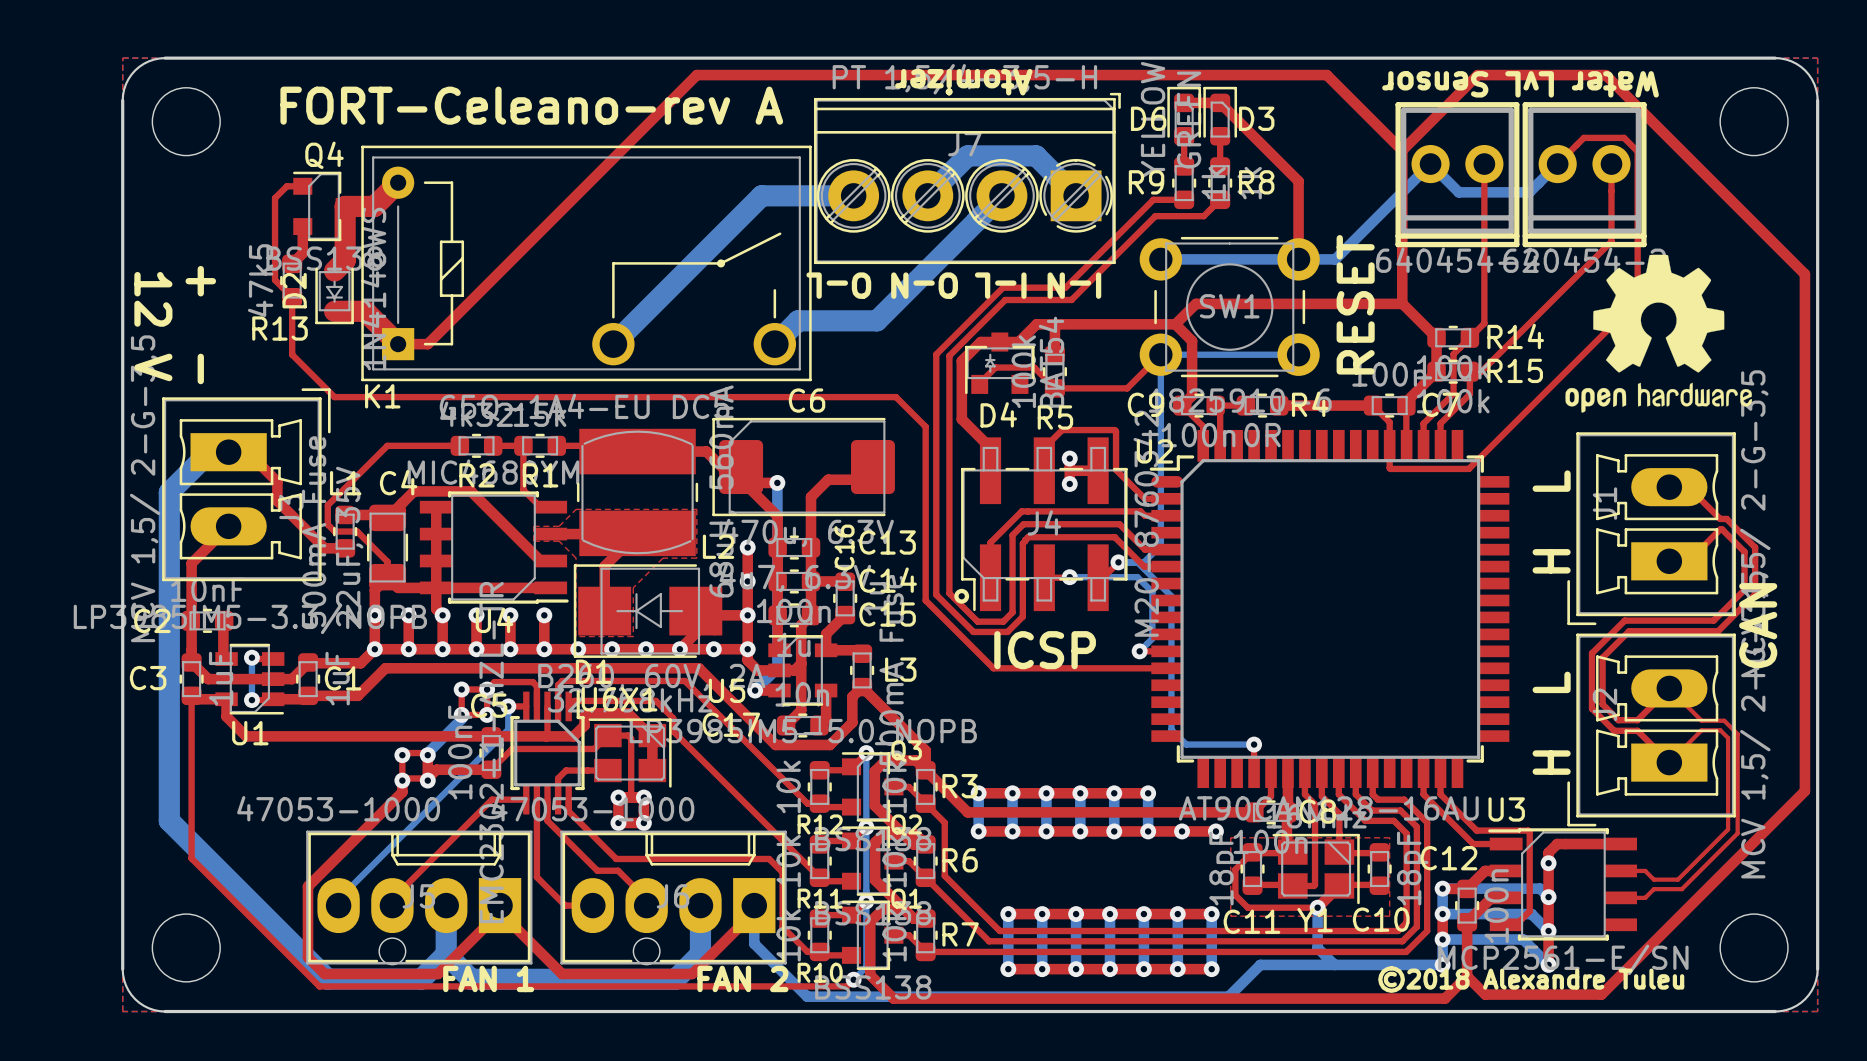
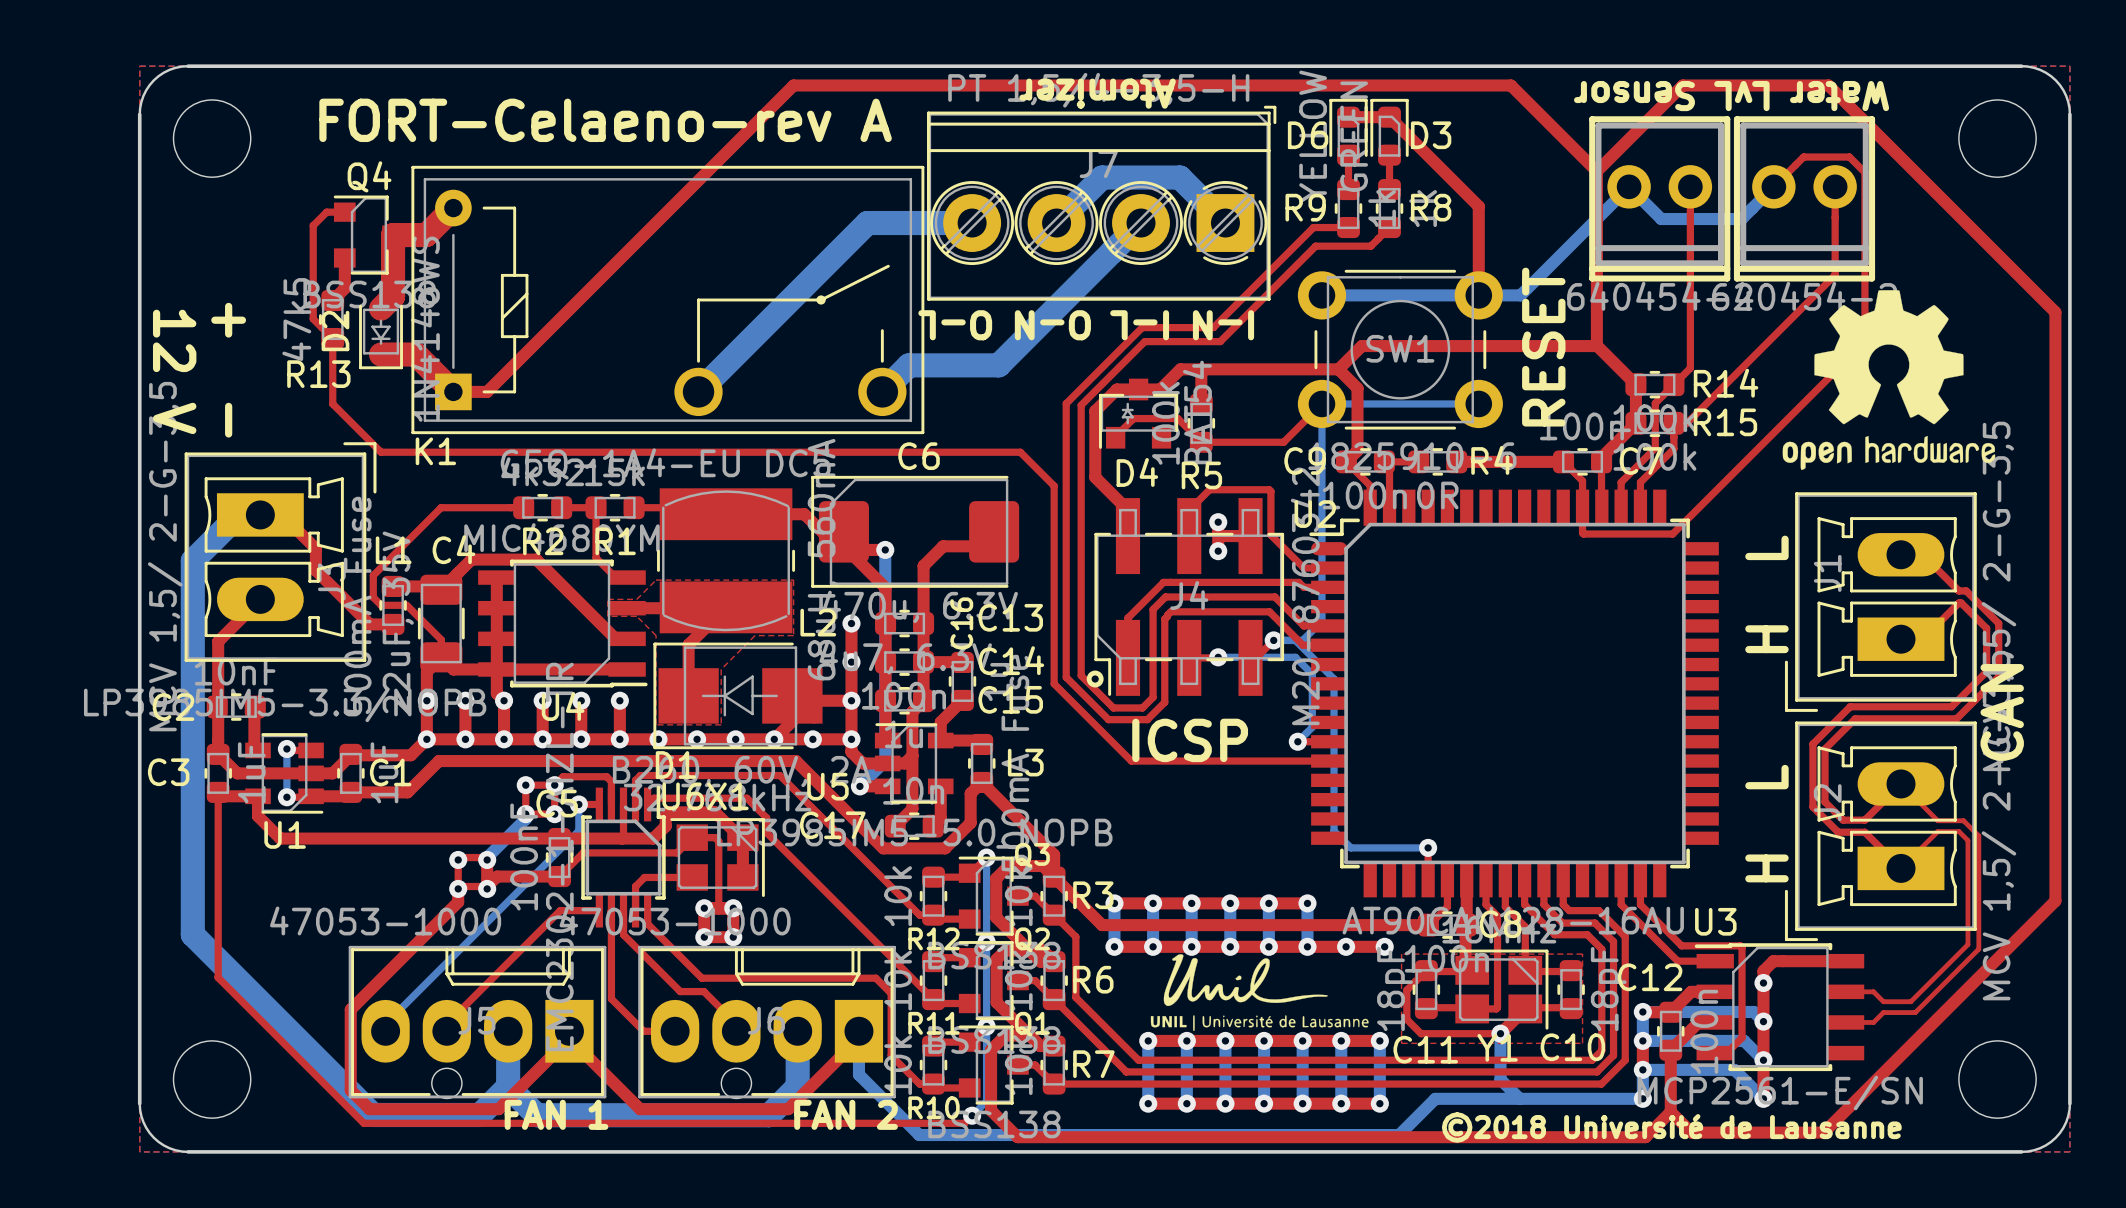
text: FORT-Celeano-rev A (531, 105) -> FORT-Celaeno-rev A (605, 120)
drawing: none -> [1150, 954, 1369, 1031]
text: ©2018 Alexandre Tuleu (1531, 979) -> none
text: none -> ©2018 Université de Lausanne (1671, 1127)

